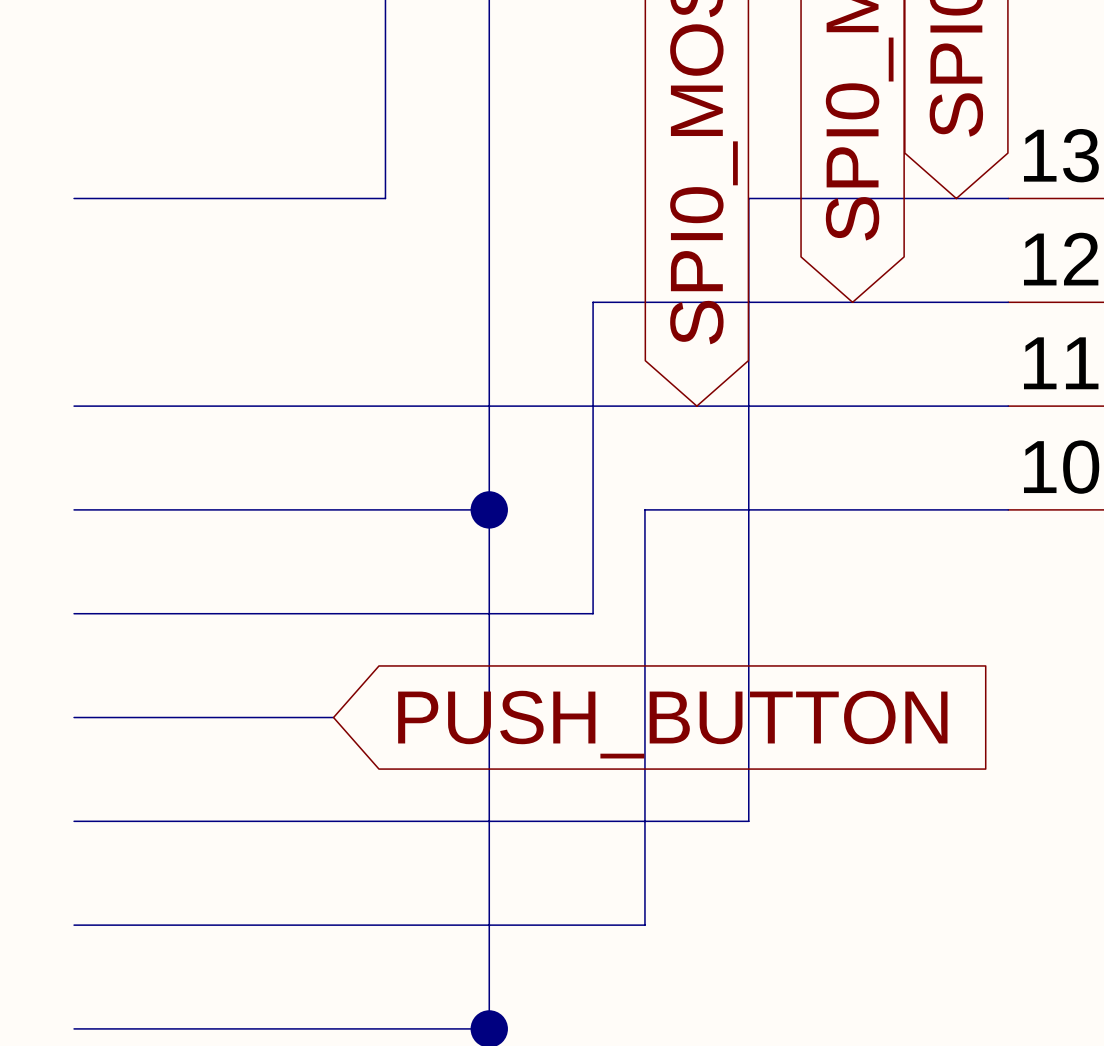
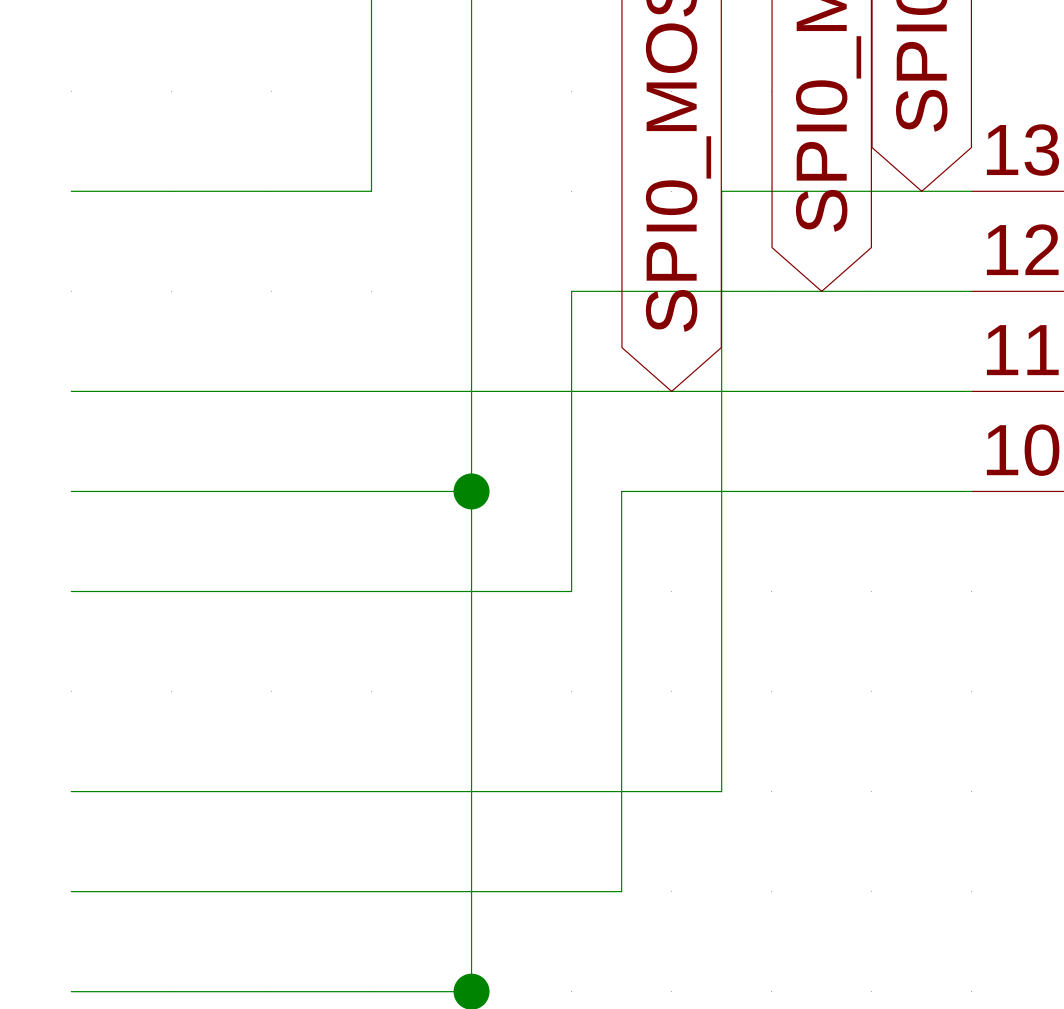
wire: (74, 717) (333, 717) -> none
global label: PUSH_BUTTON (672, 724) -> none

